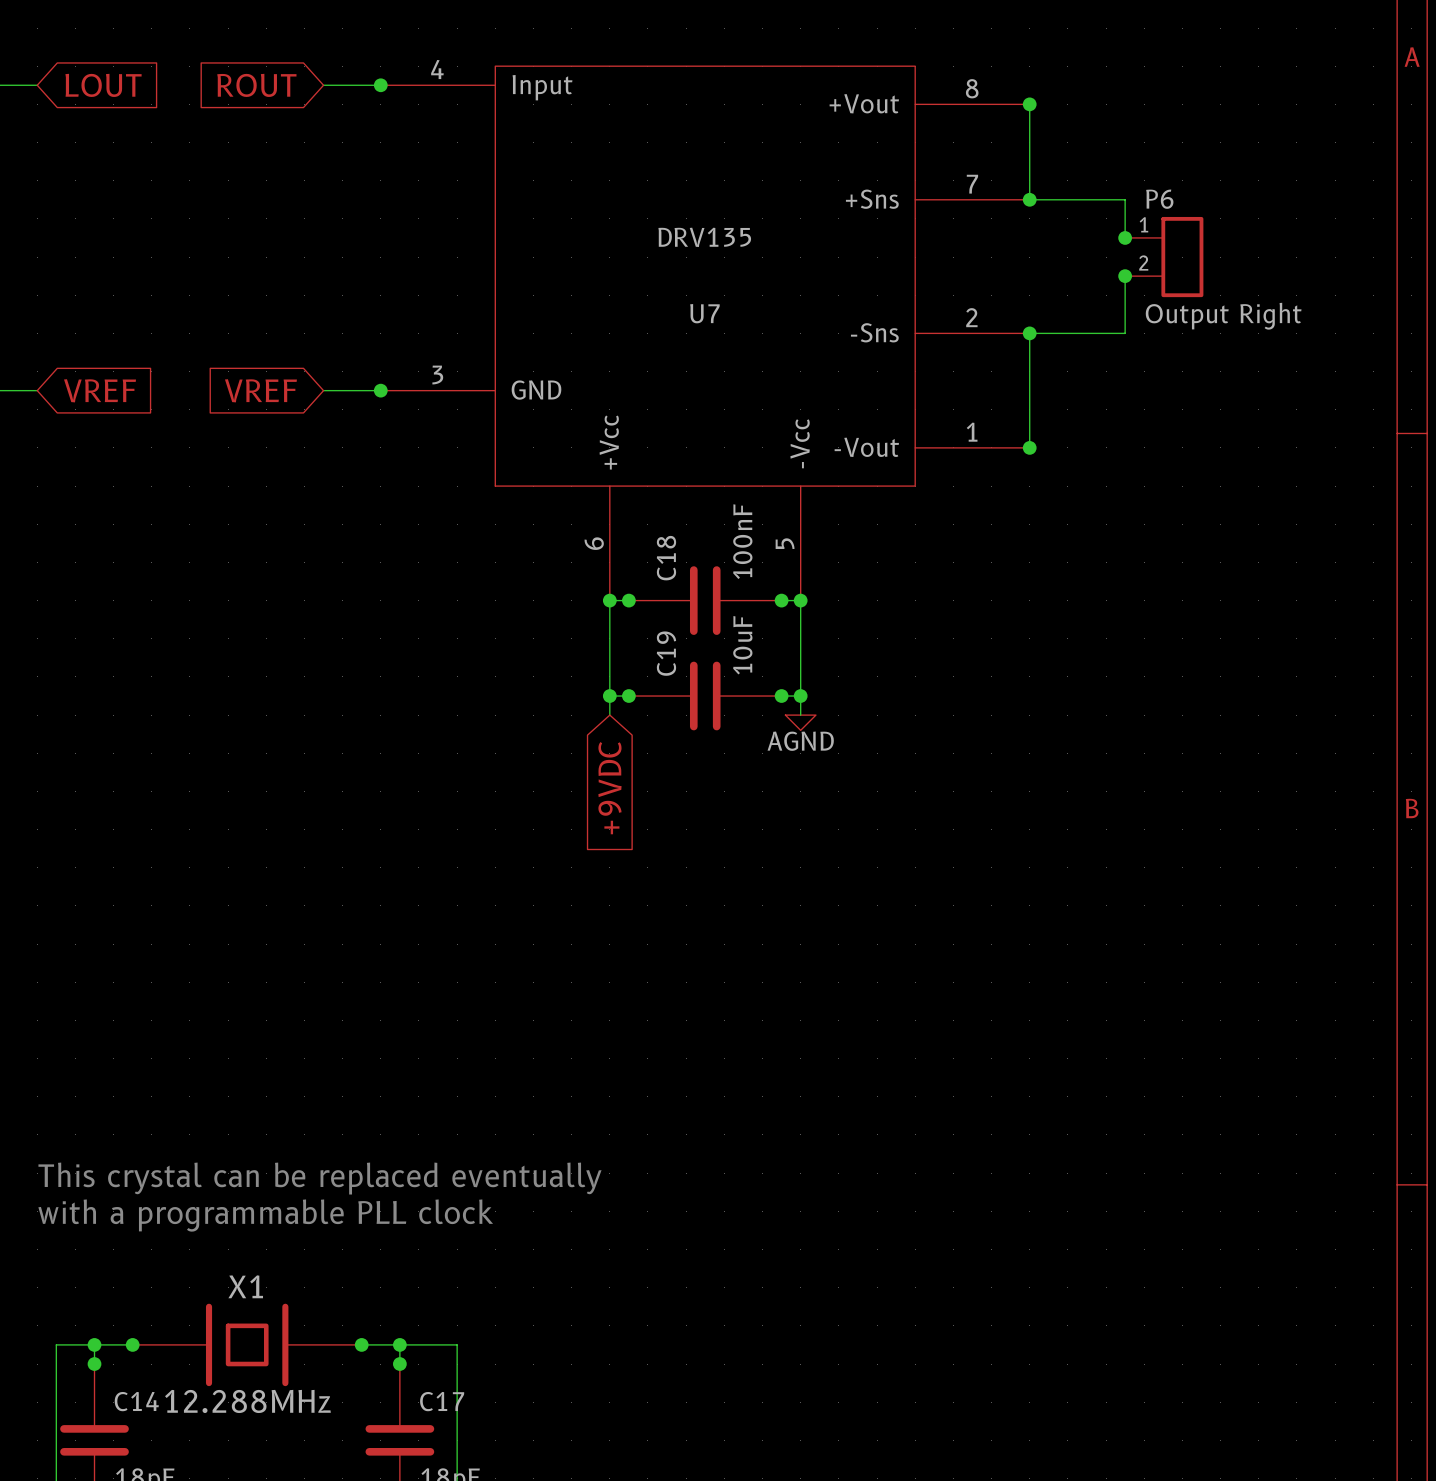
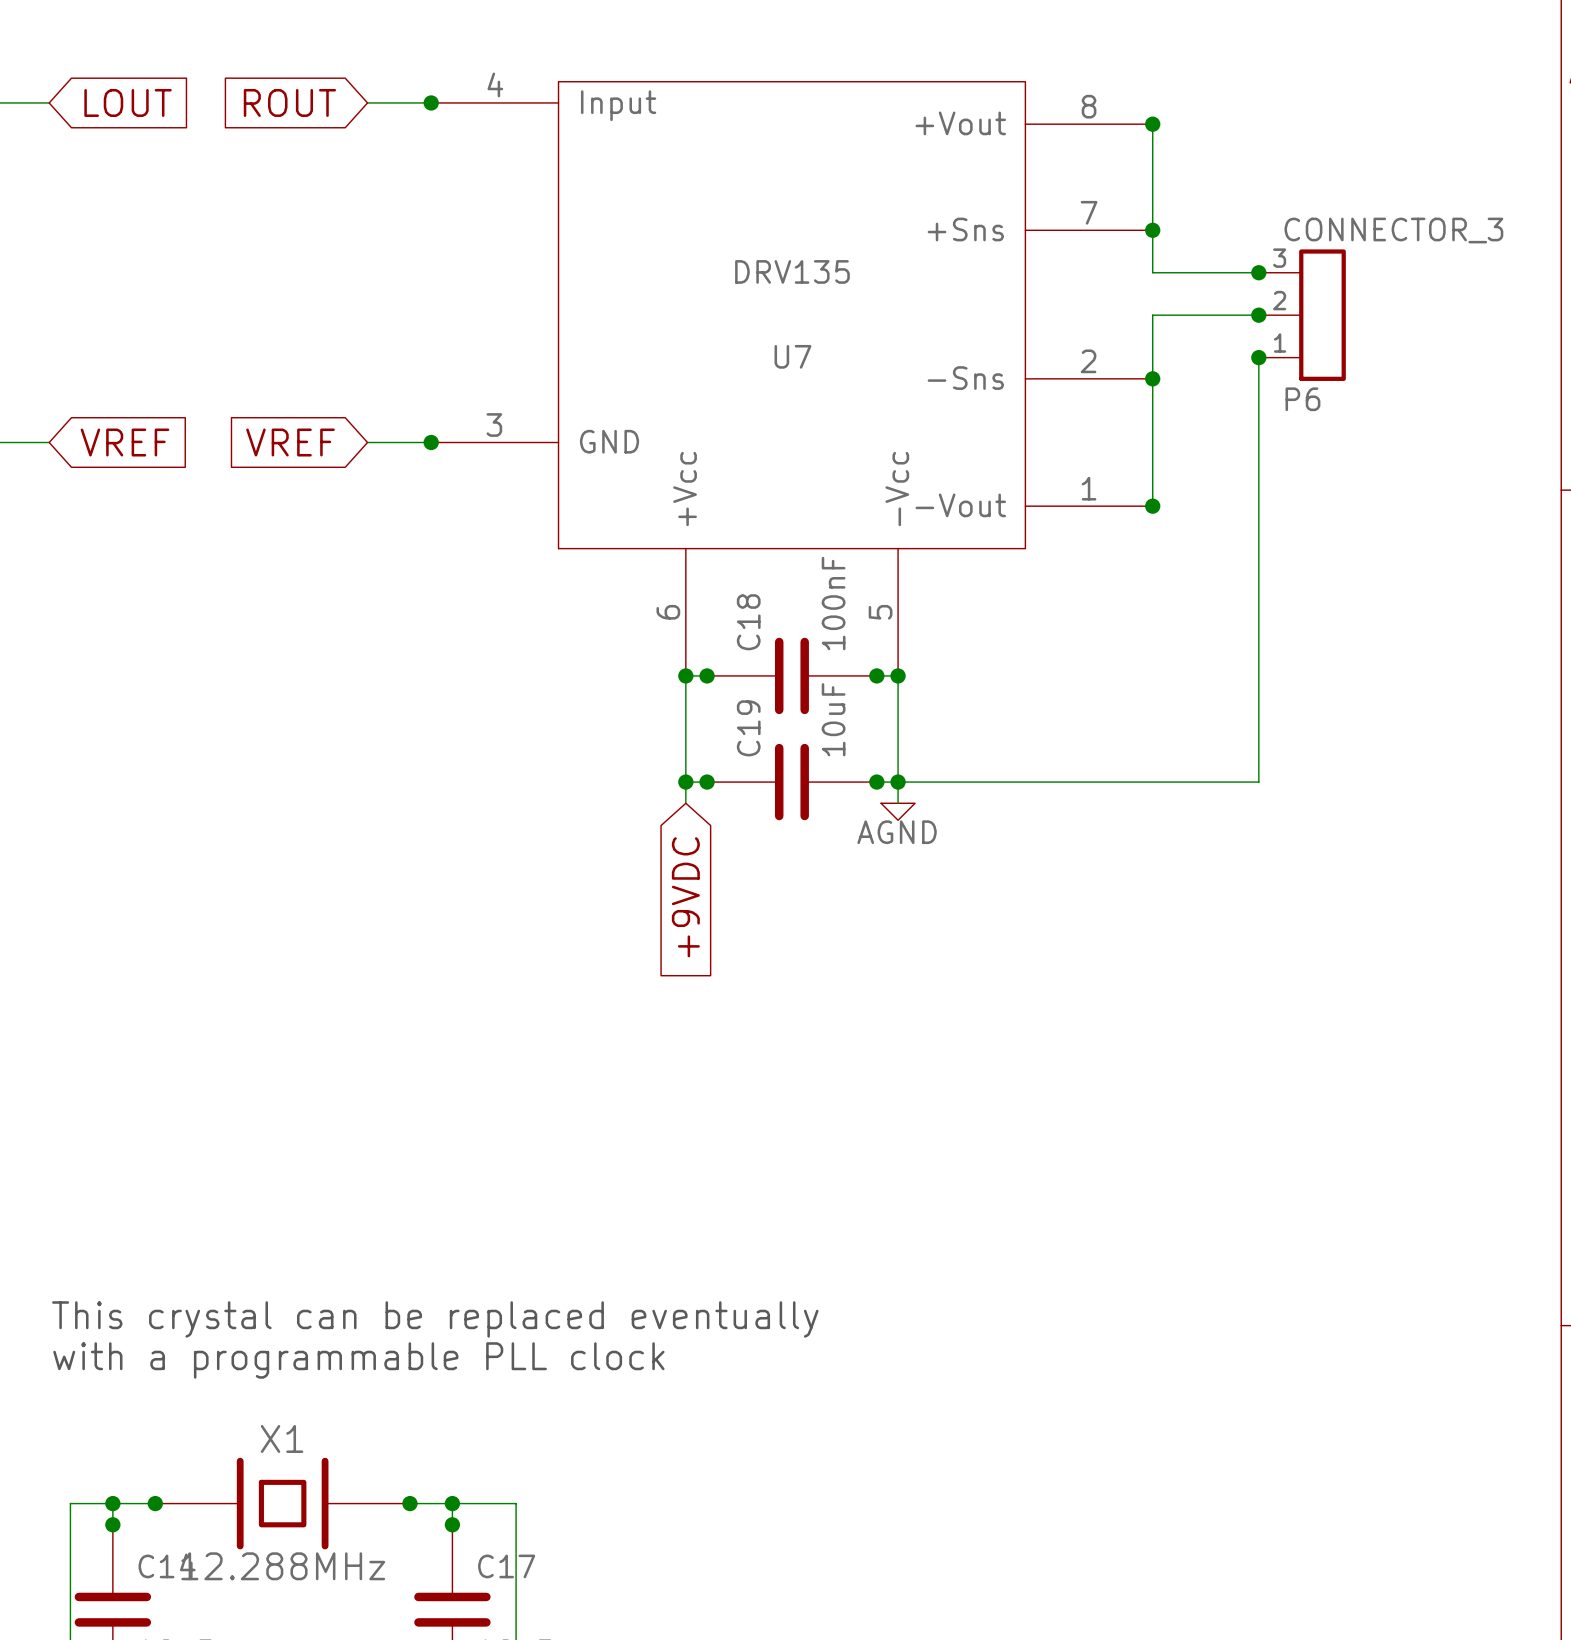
wire: (1029, 199) (1125, 199) (1125, 237) -> (1152, 230) (1152, 272) (1258, 272)
P6 name position: P6 (1159, 199) -> P6 (1302, 399)
P6 symbol: [1125, 216, 1204, 298] -> [1258, 249, 1346, 381]
wire: (1125, 276) (1125, 314) -> none
junction: none -> (1258, 357)
P6 value: Output Right (1223, 316) -> CONNECTOR_3 (1393, 230)
wire: (1029, 333) (1125, 333) -> (1152, 378) (1152, 315) (1258, 315)
wire: none -> (1258, 378) (1258, 782) (898, 782)

